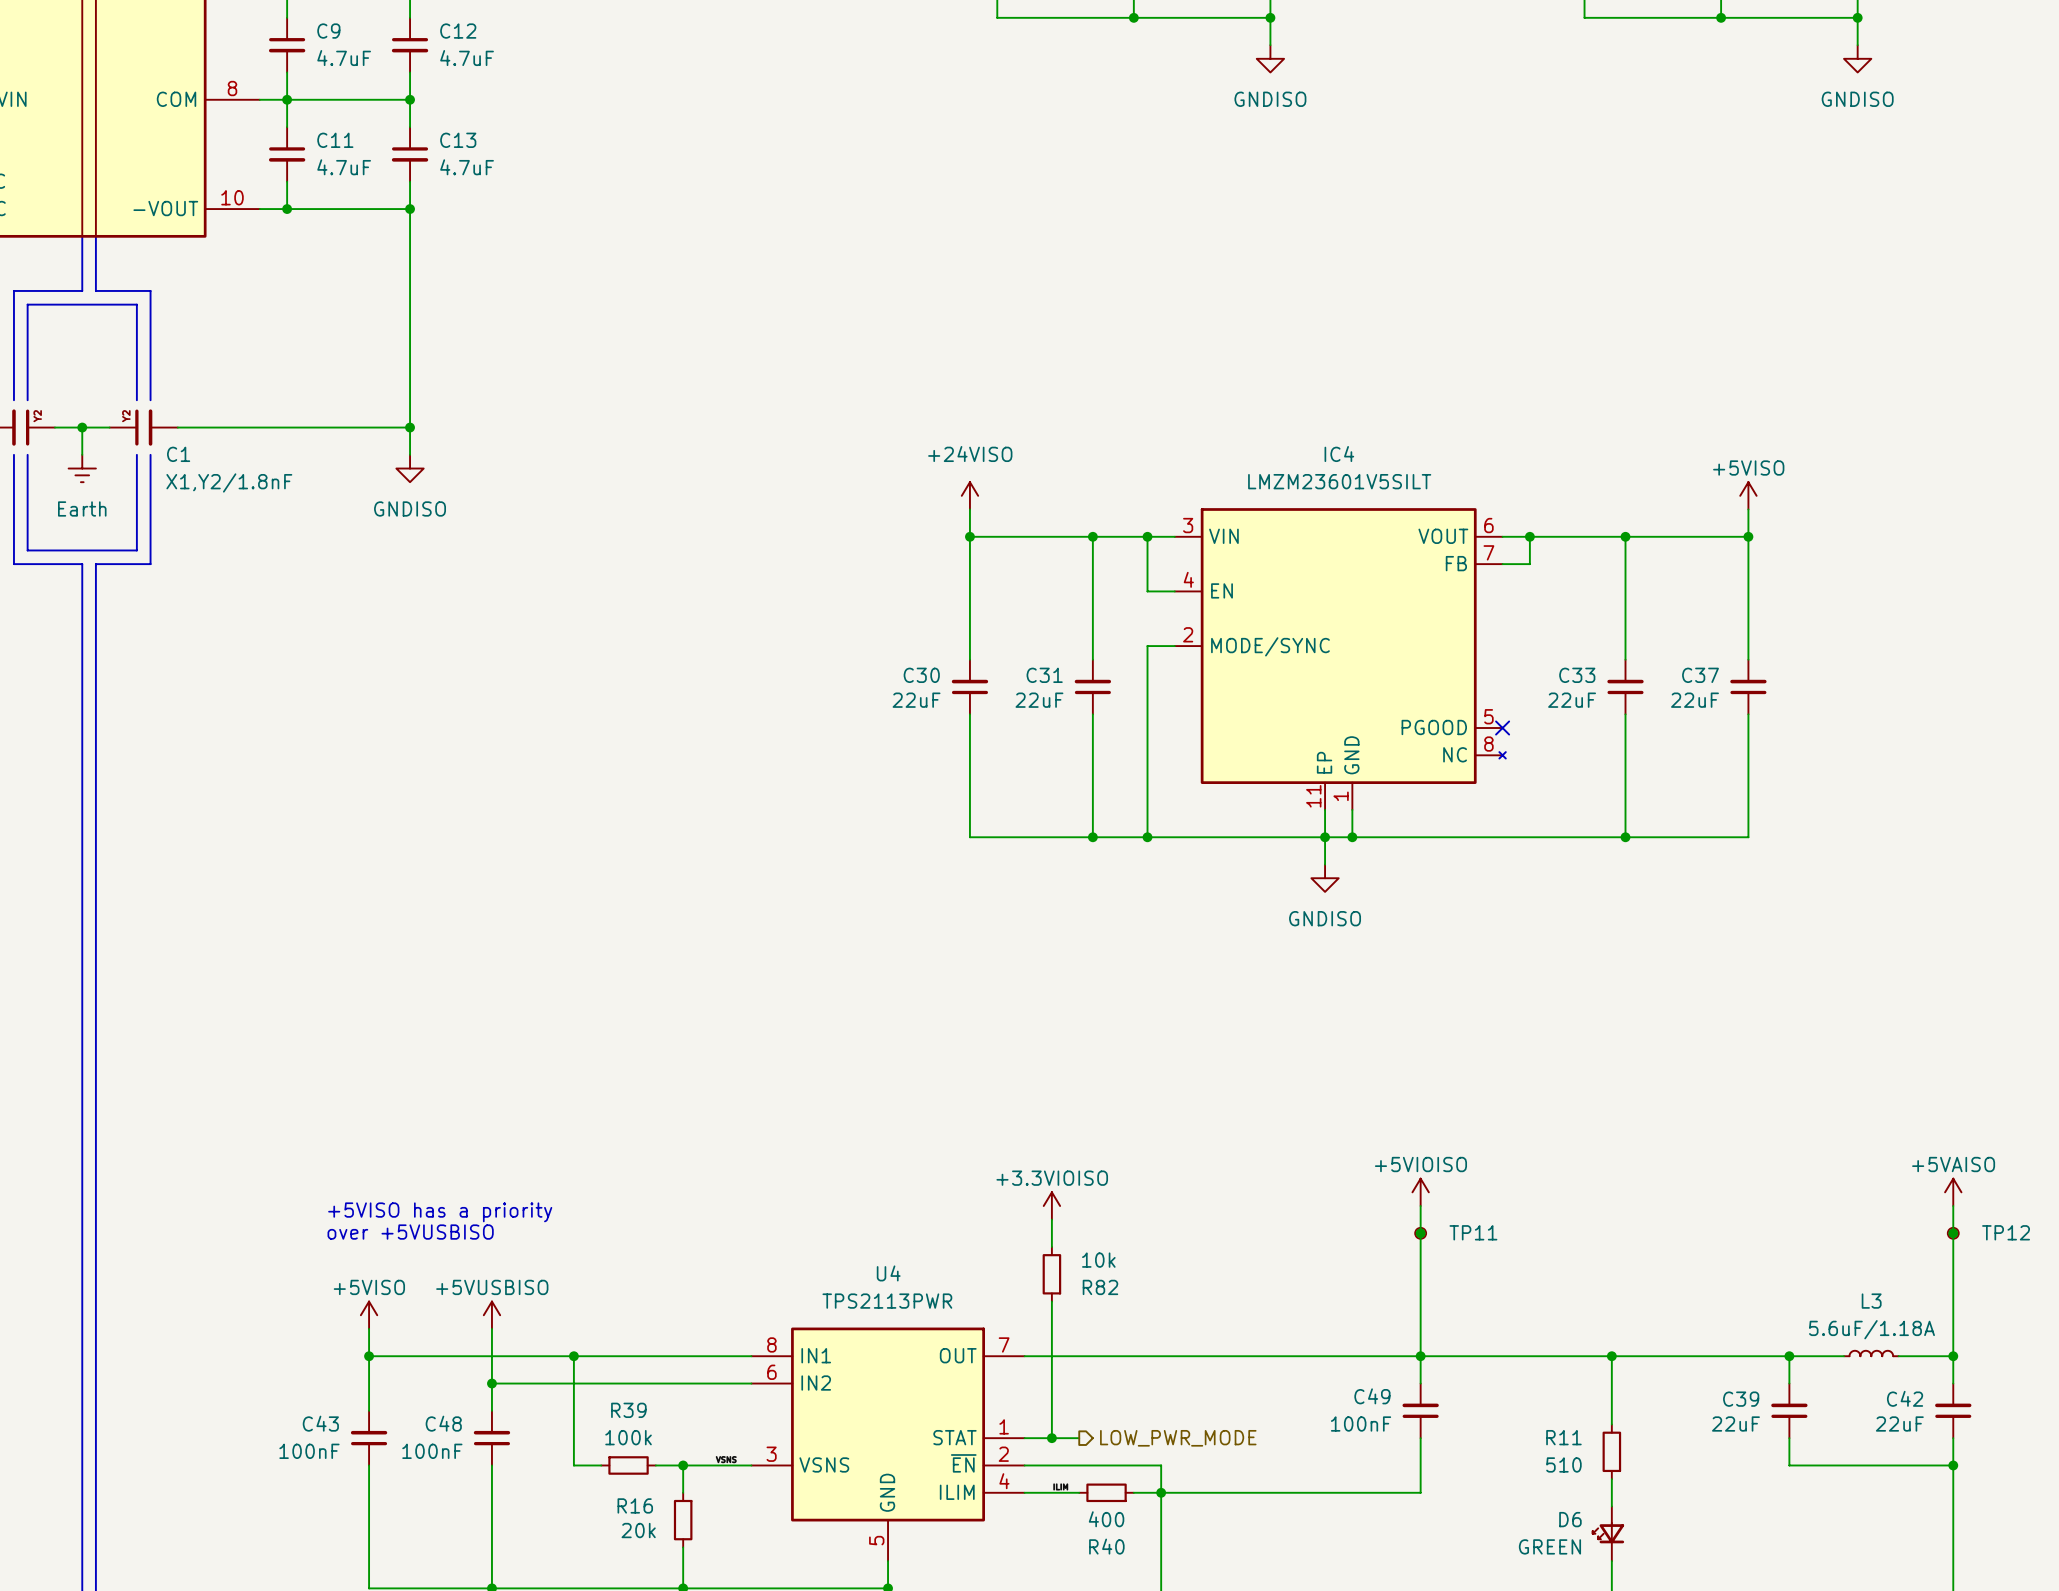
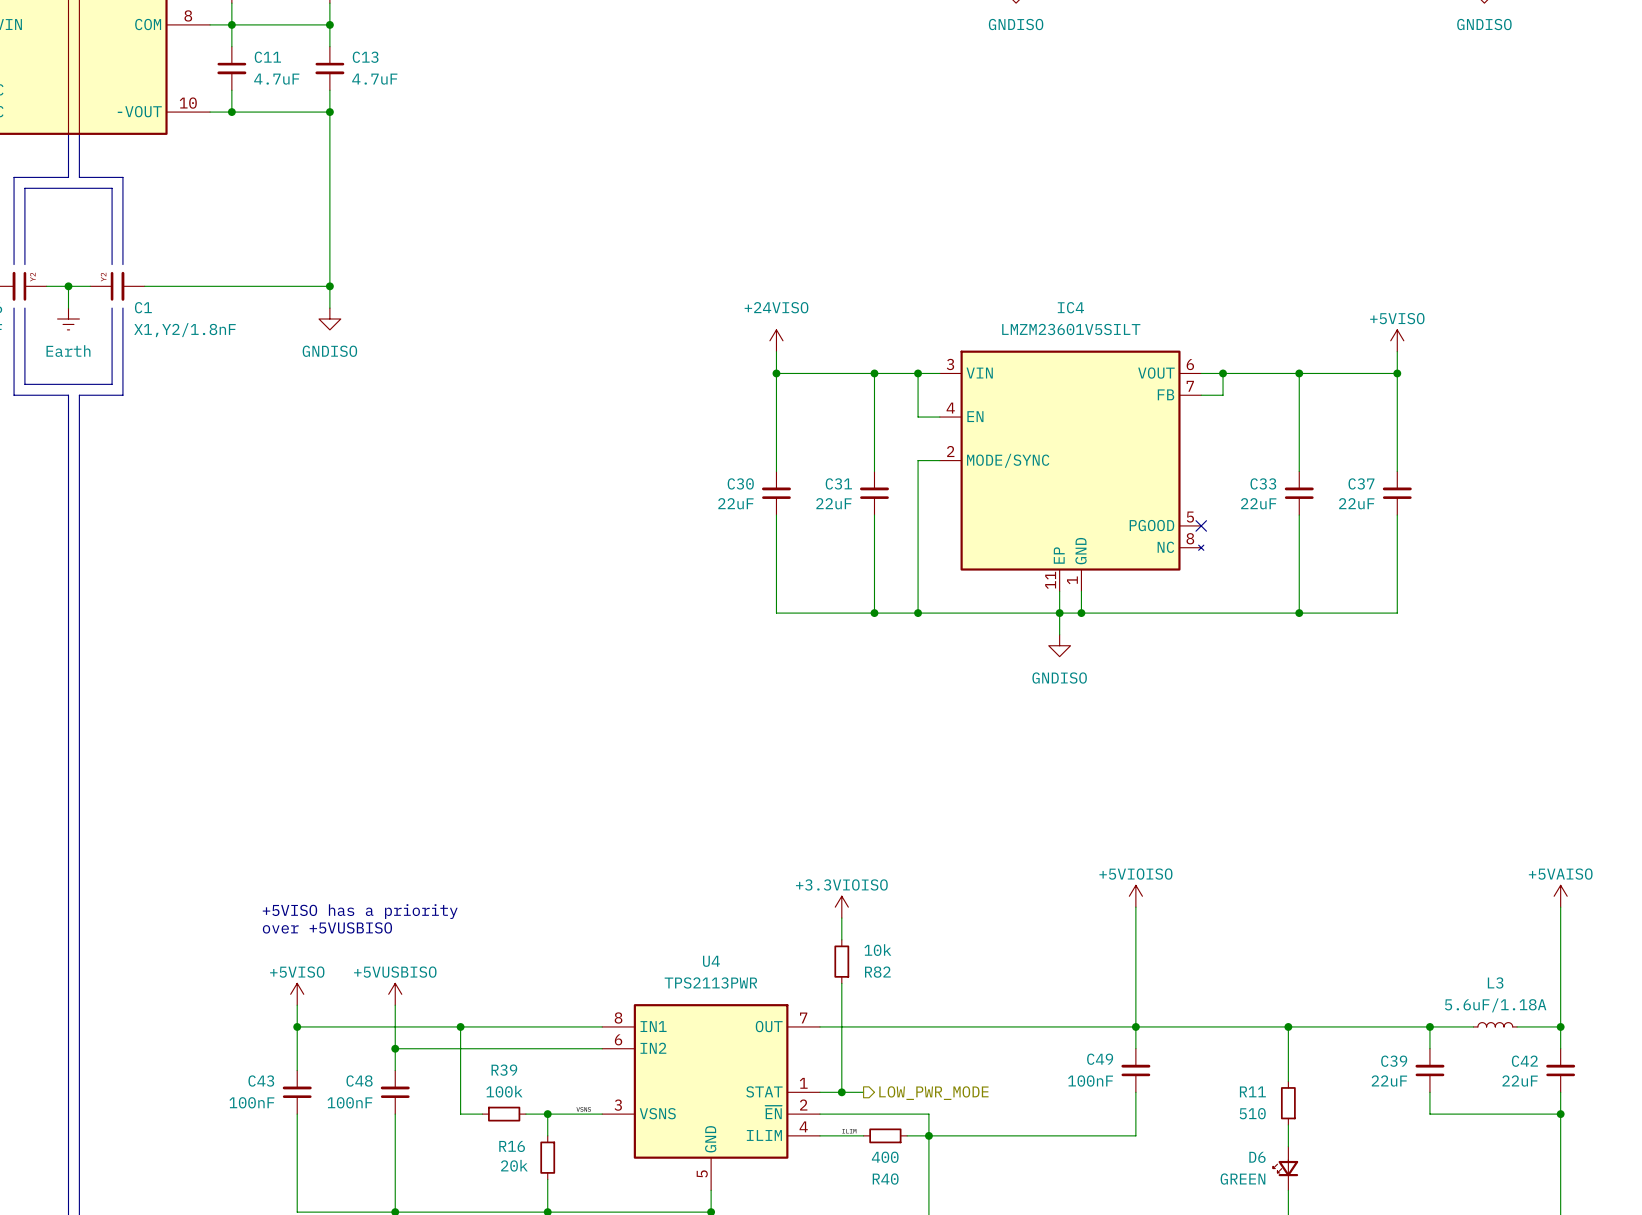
junction: (1420, 1233) -> none
TP11: (1420, 1233) -> none
junction: (1953, 1233) -> none
TP12: (1953, 1233) -> none

